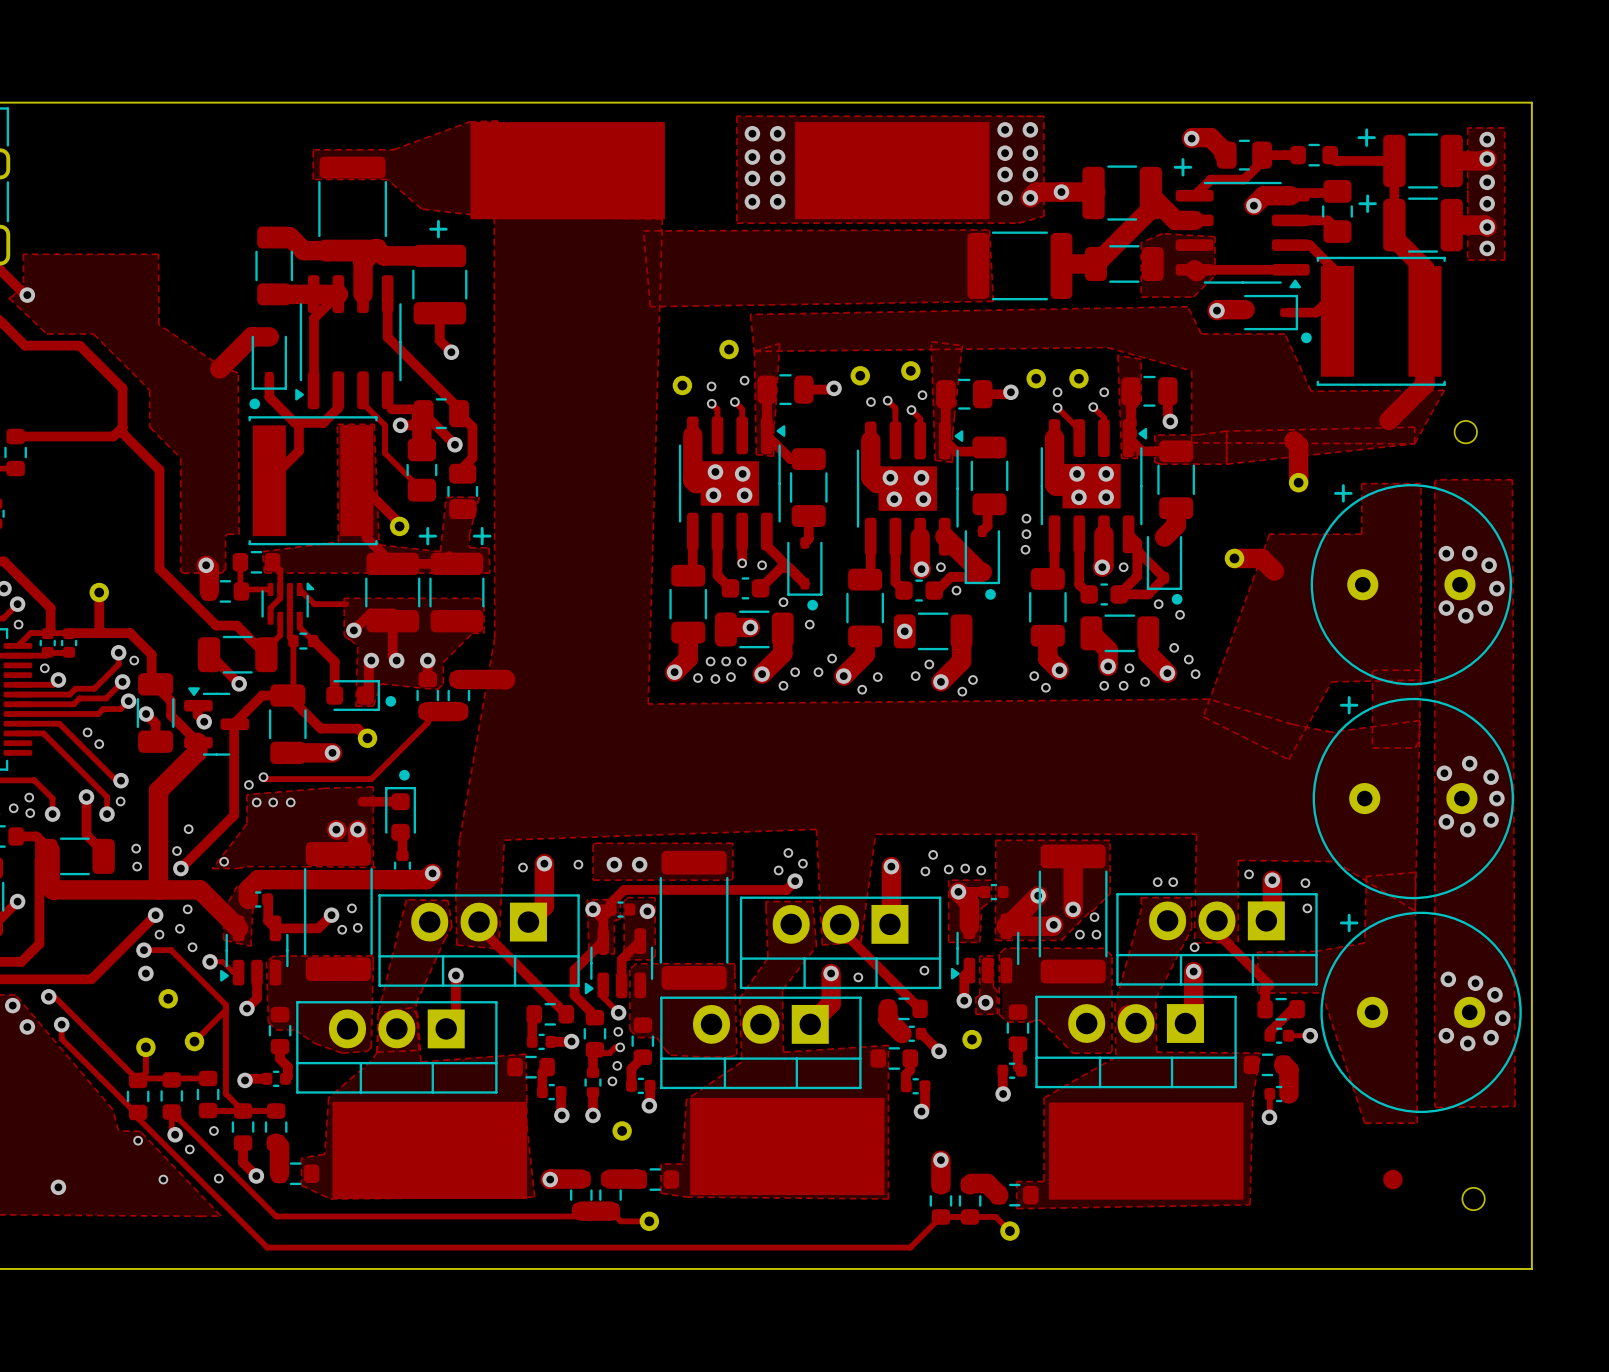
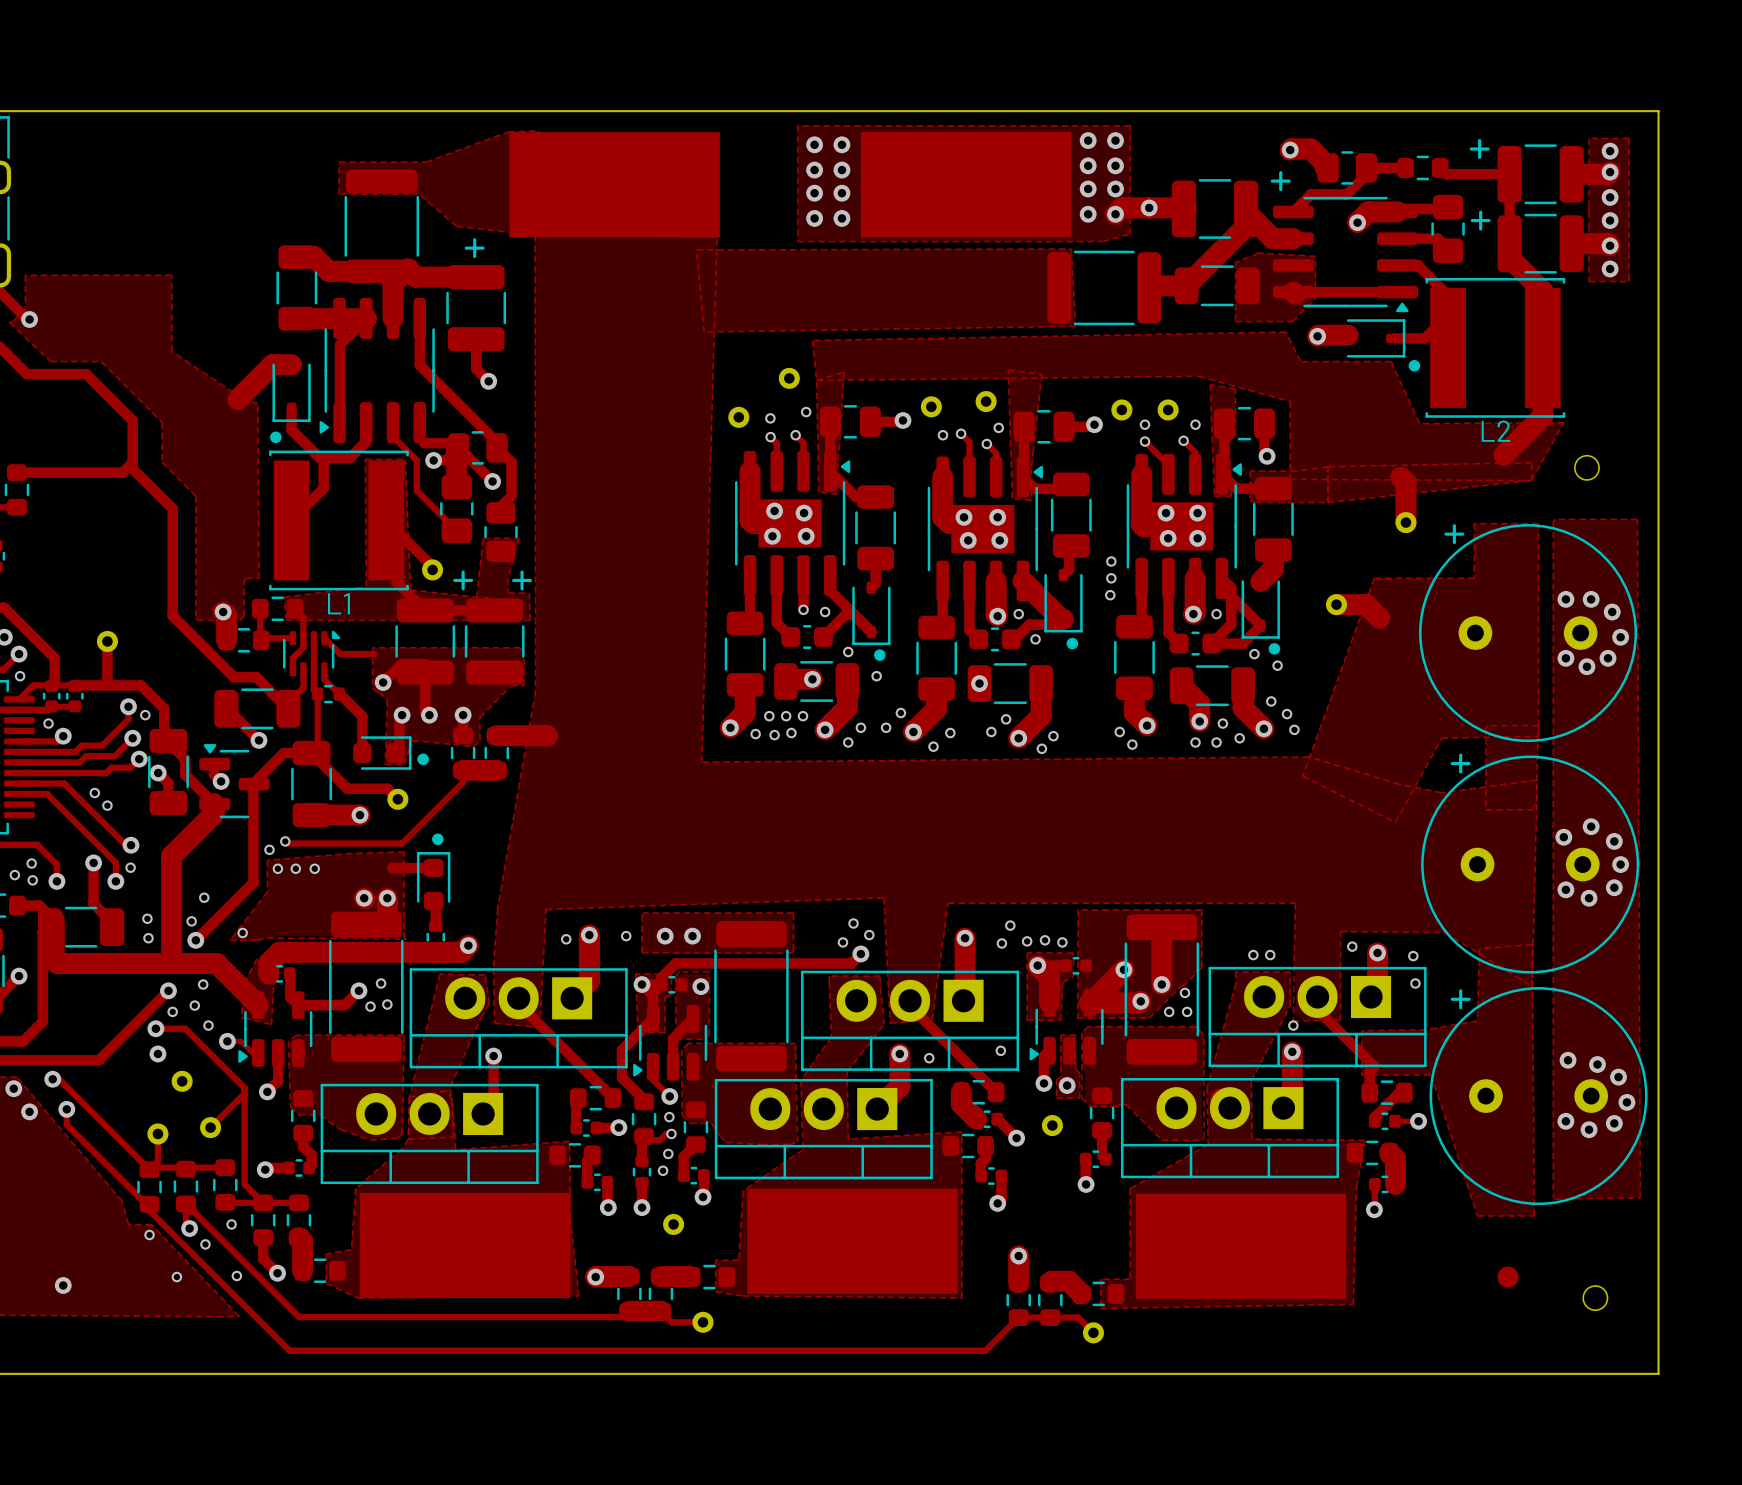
L2 name: none -> L2 (1495, 431)
L1 name: none -> L1 (338, 603)

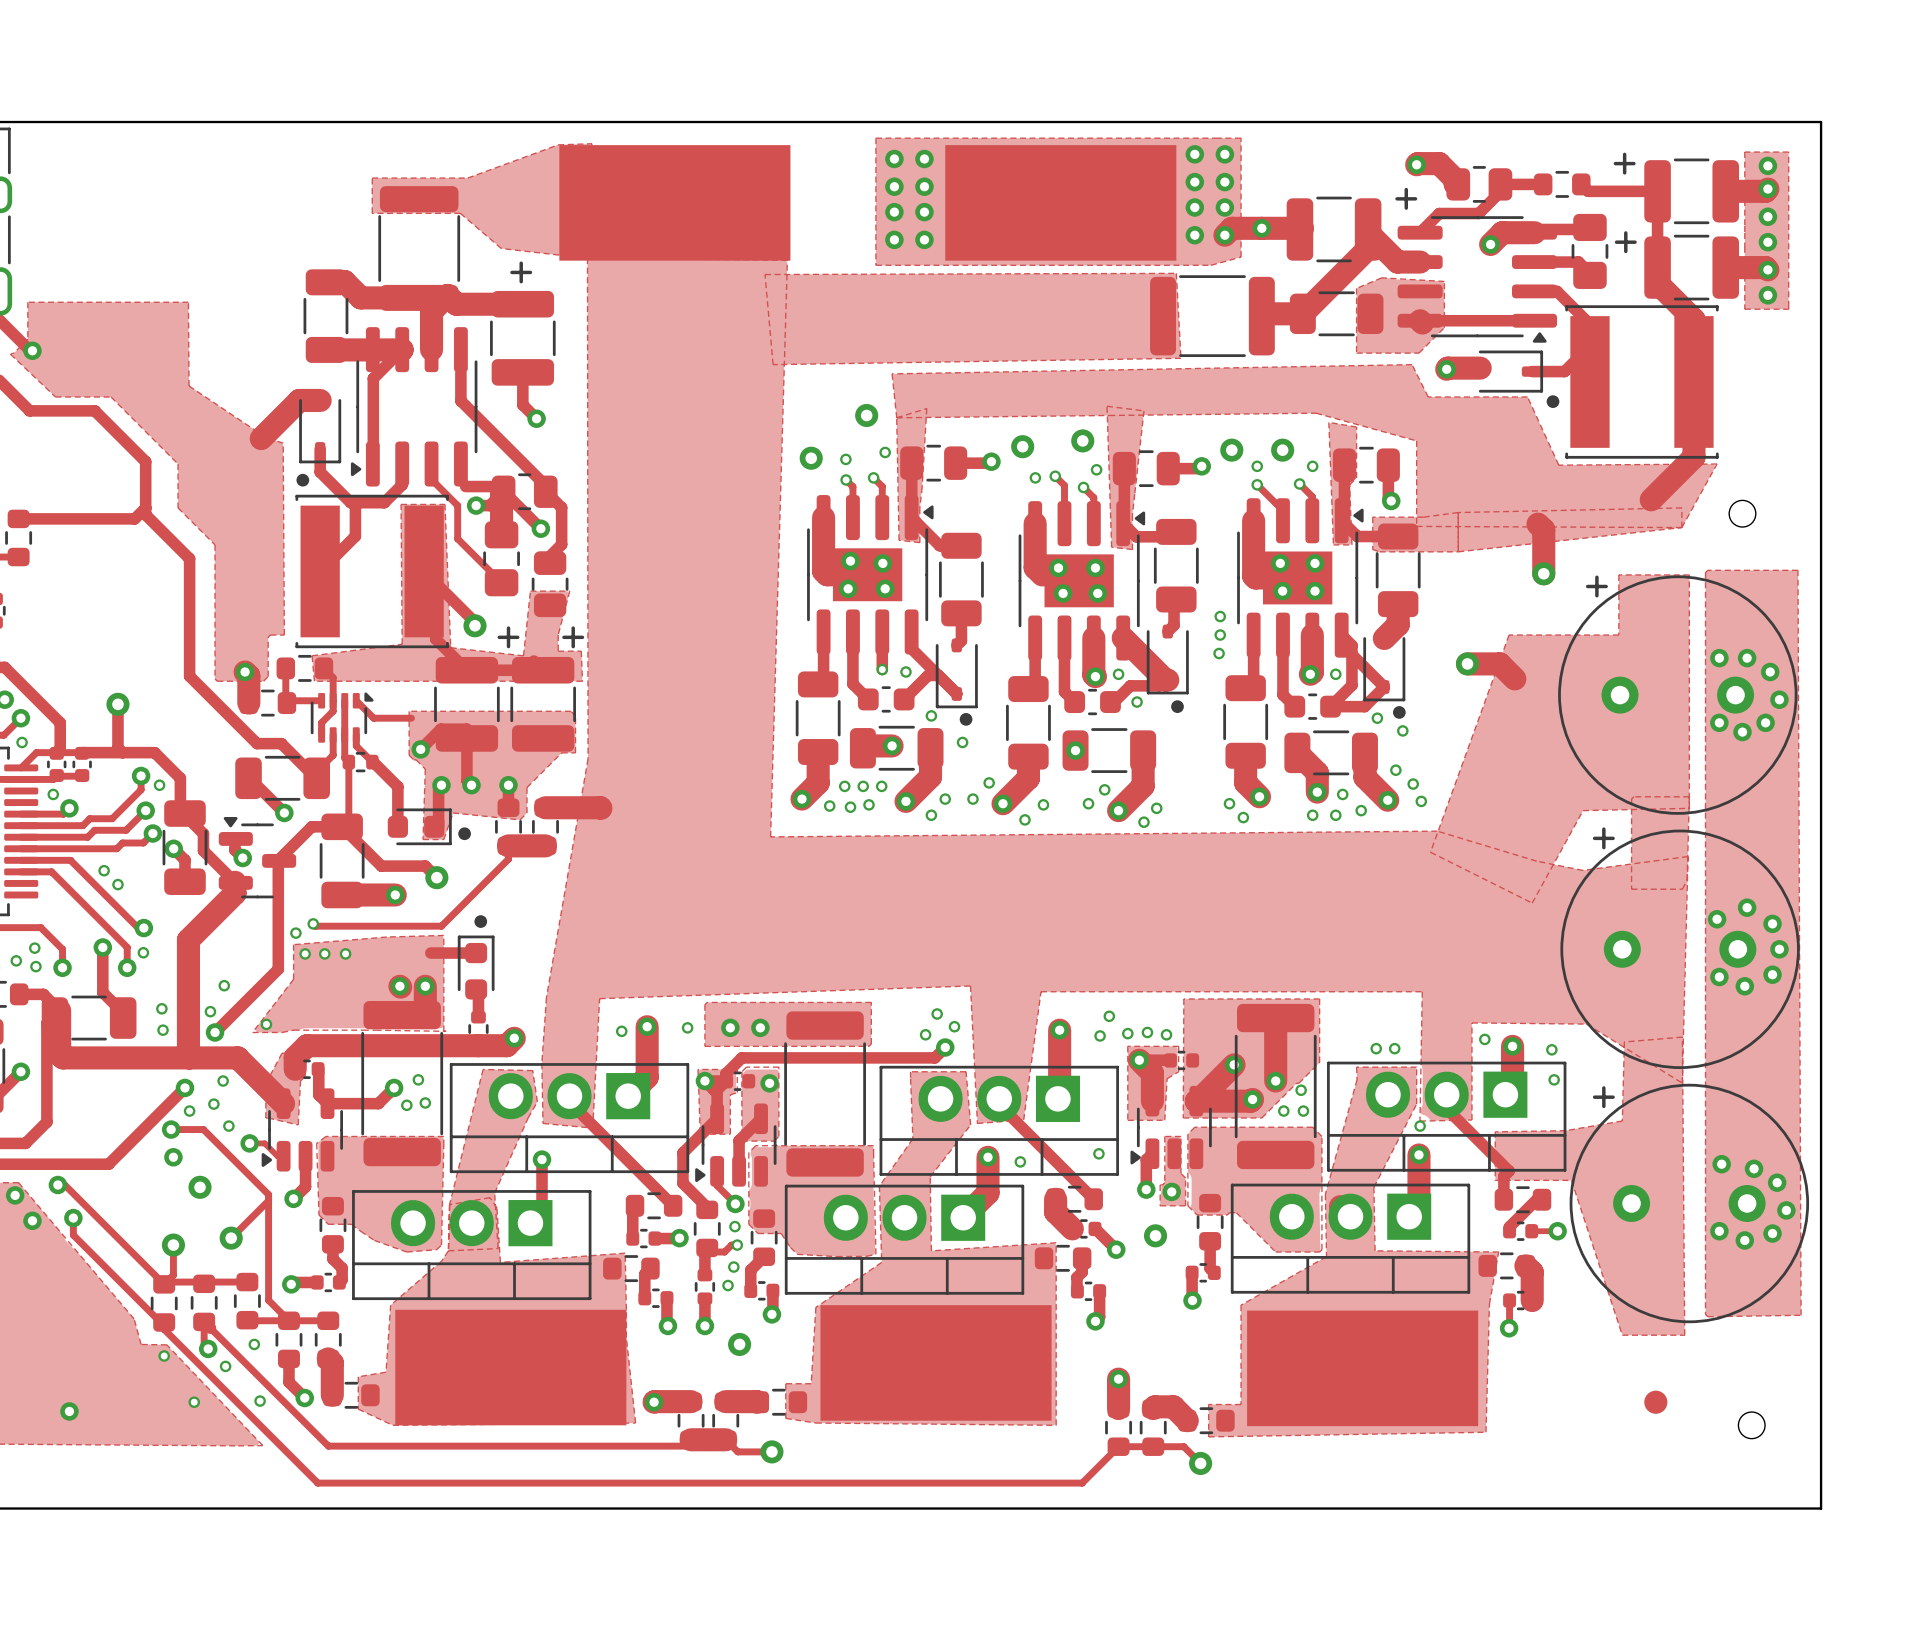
L2 name: L2 (1495, 431) -> none
L1 name: L1 (338, 603) -> none

